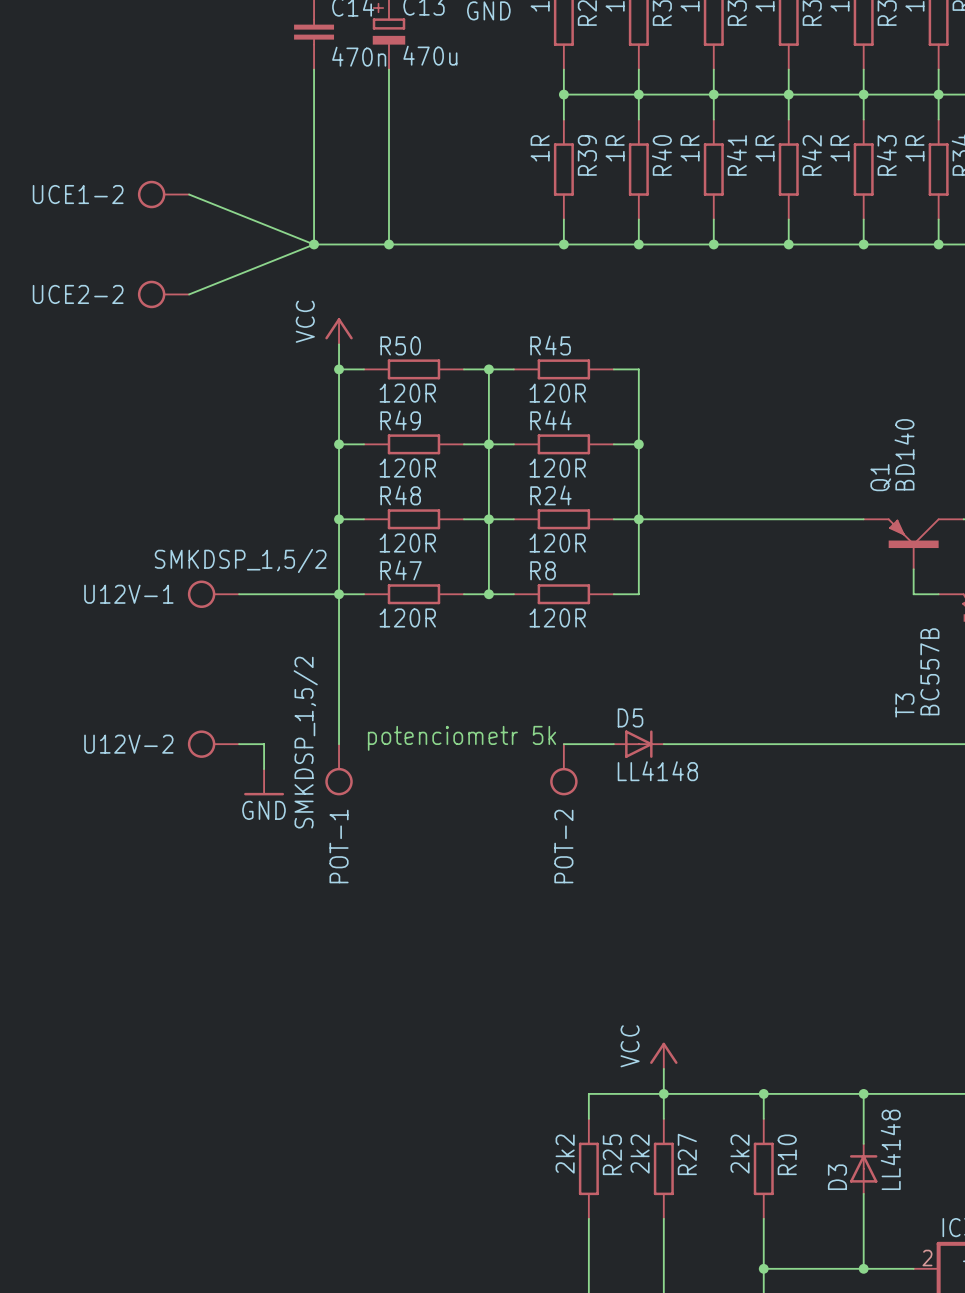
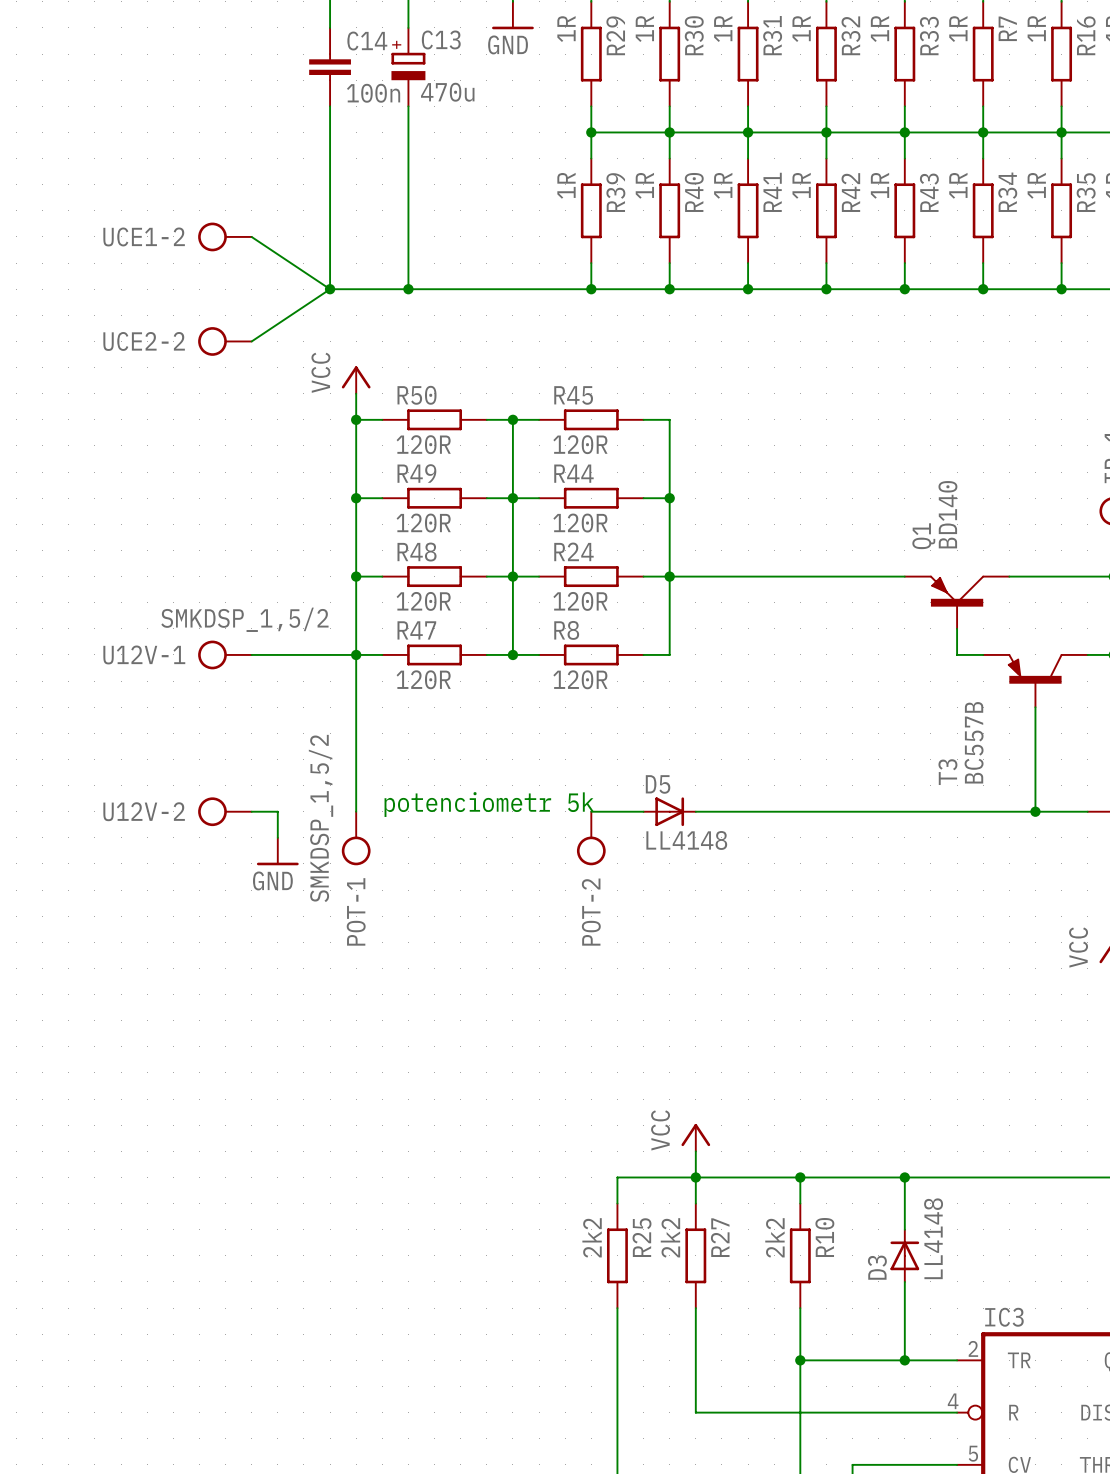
C14 value: 470n (359, 56) -> 100n (373, 93)
UCE1-2 position: (163, 194) -> (224, 236)
wire: (189, 194) (314, 244) (189, 294) -> none
wire: none -> (251, 236) (330, 289) (251, 341)
UCE2-2 position: (163, 294) -> (224, 341)

